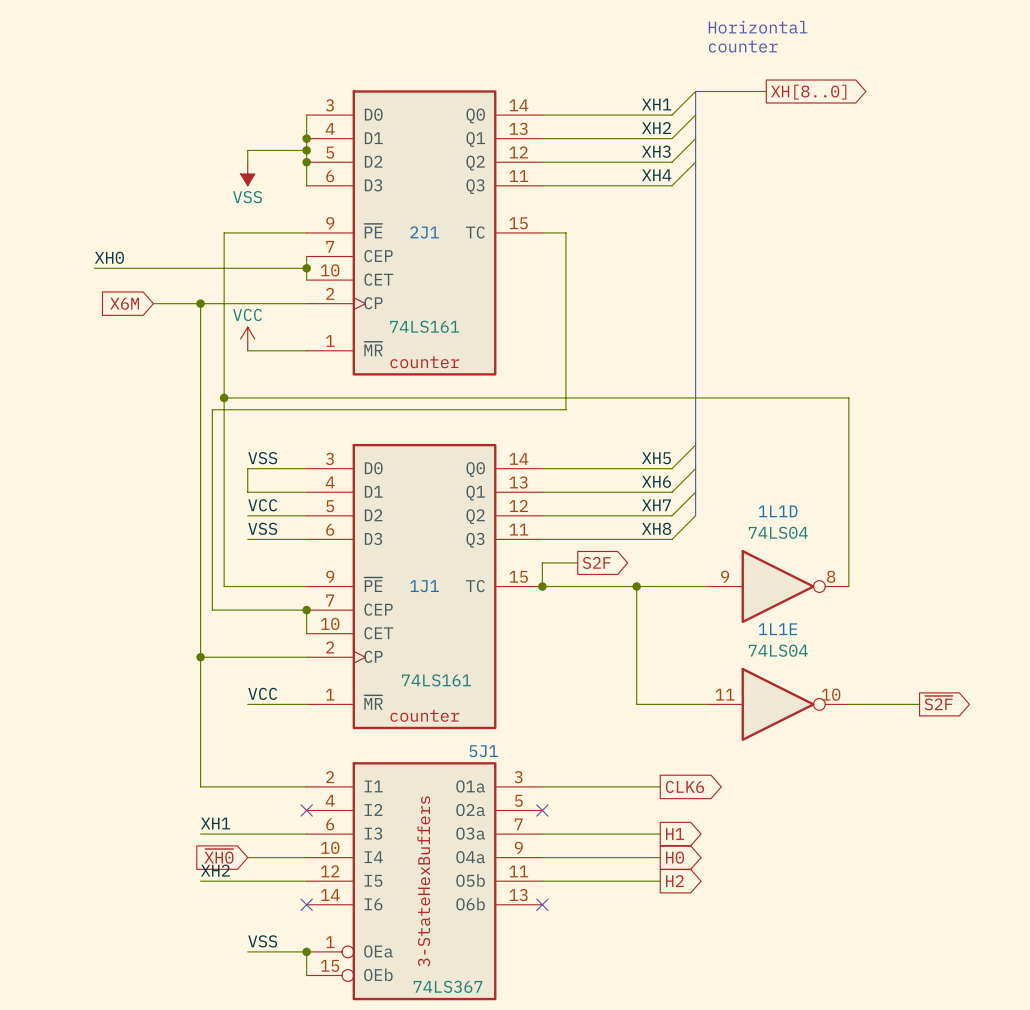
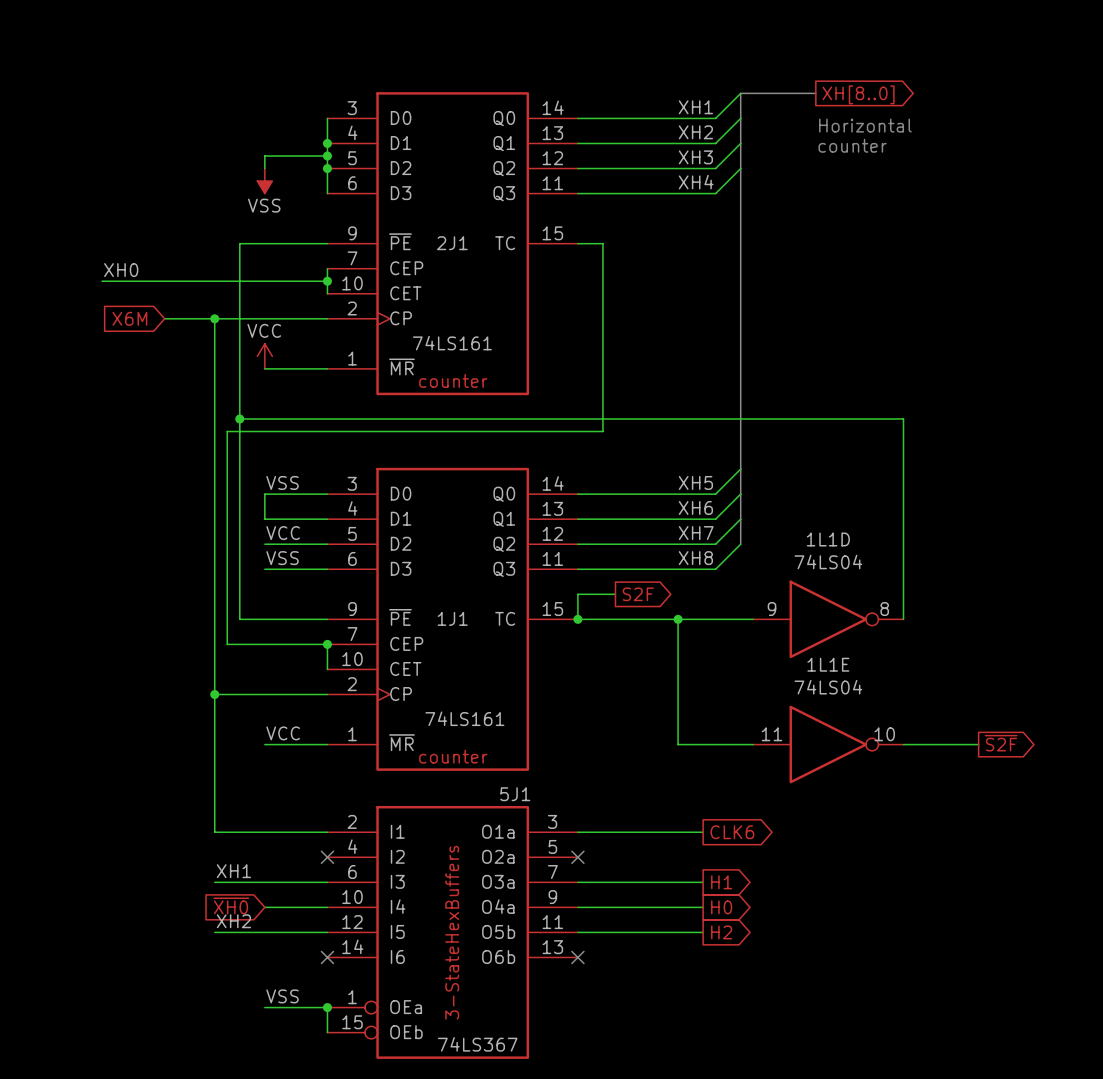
text position: Horizontal (758, 27) -> Horizontal (865, 125)
text position: counter (743, 46) -> counter (852, 145)

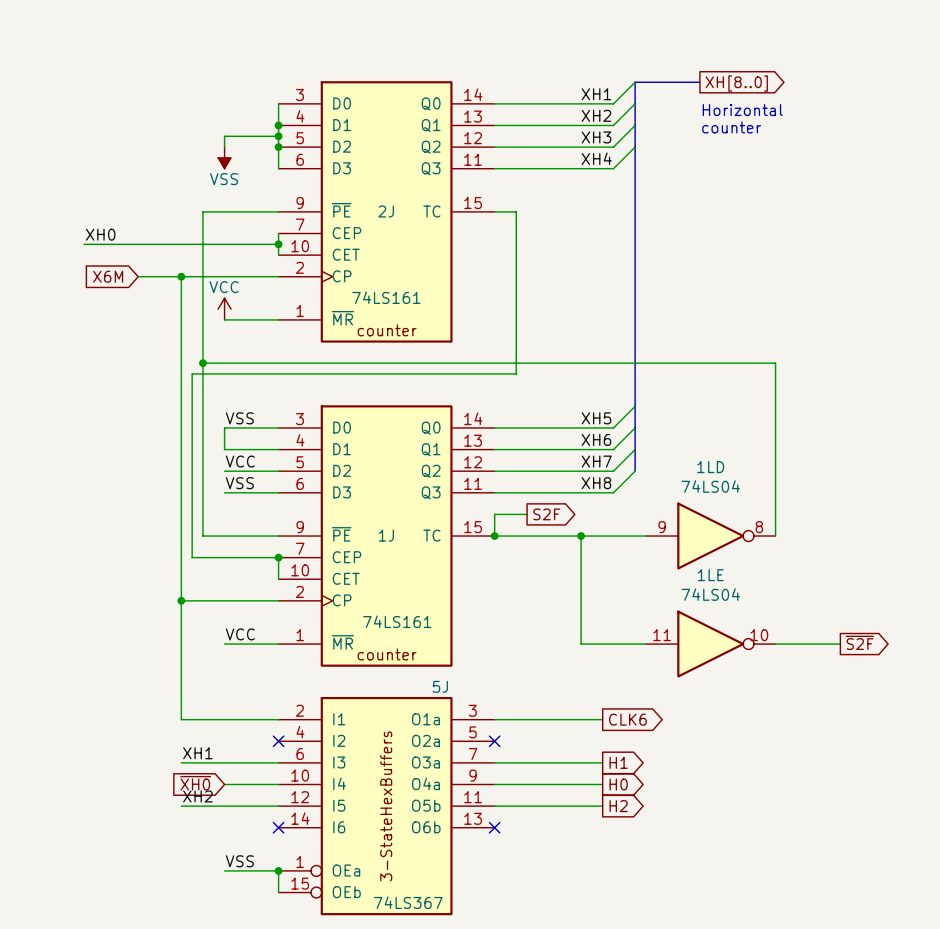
2J1 name: 2J1 (452, 243) -> 2J (386, 211)
1L1D name: 1L1D (828, 539) -> 1LD (710, 467)
1J1 name: 1J1 (452, 618) -> 1J (386, 535)
1L1E name: 1L1E (828, 664) -> 1LE (710, 575)
5J1 name: 5J1 (515, 794) -> 5J (440, 686)

